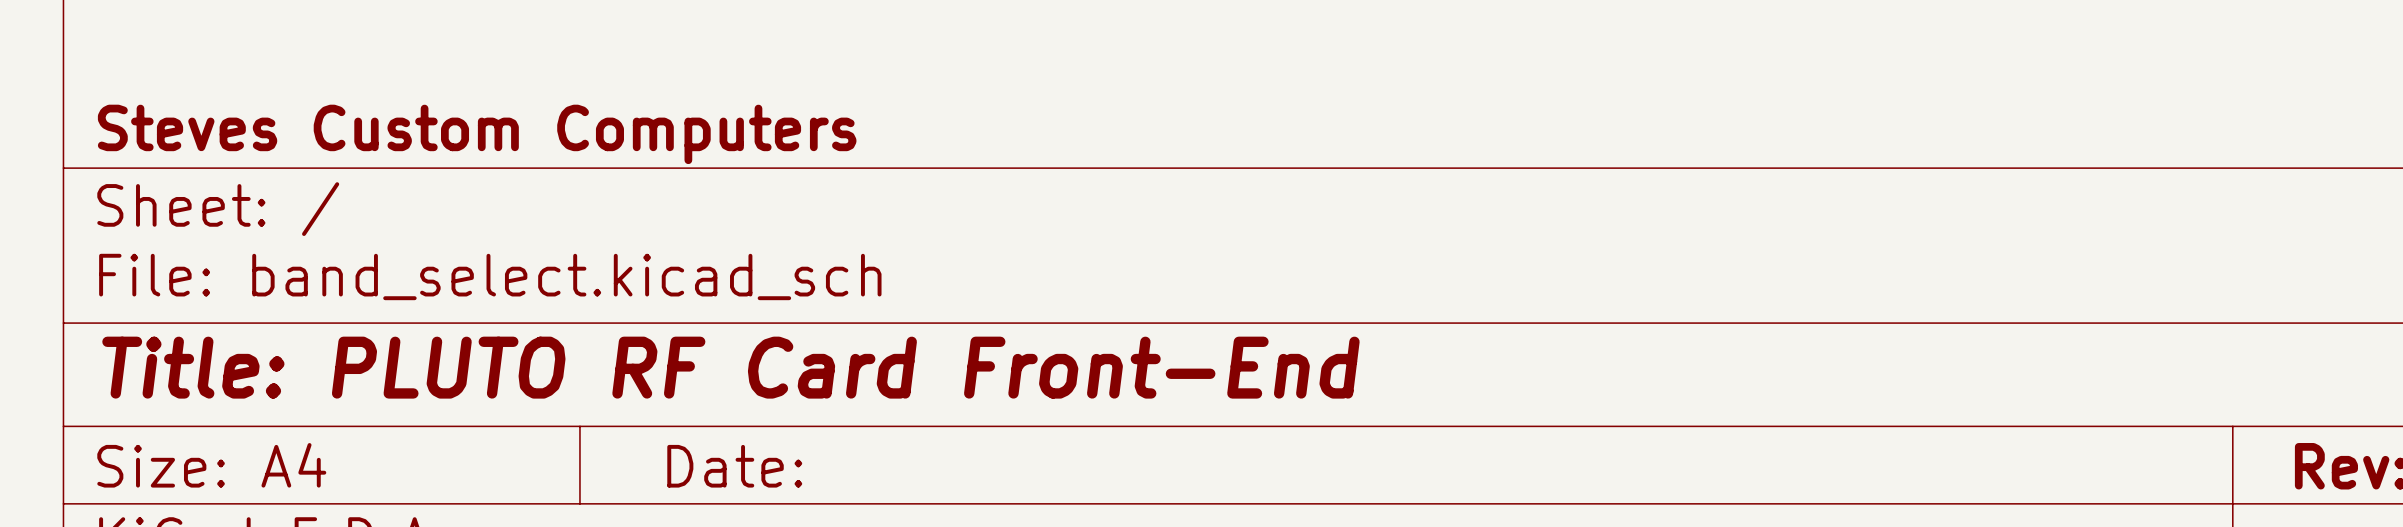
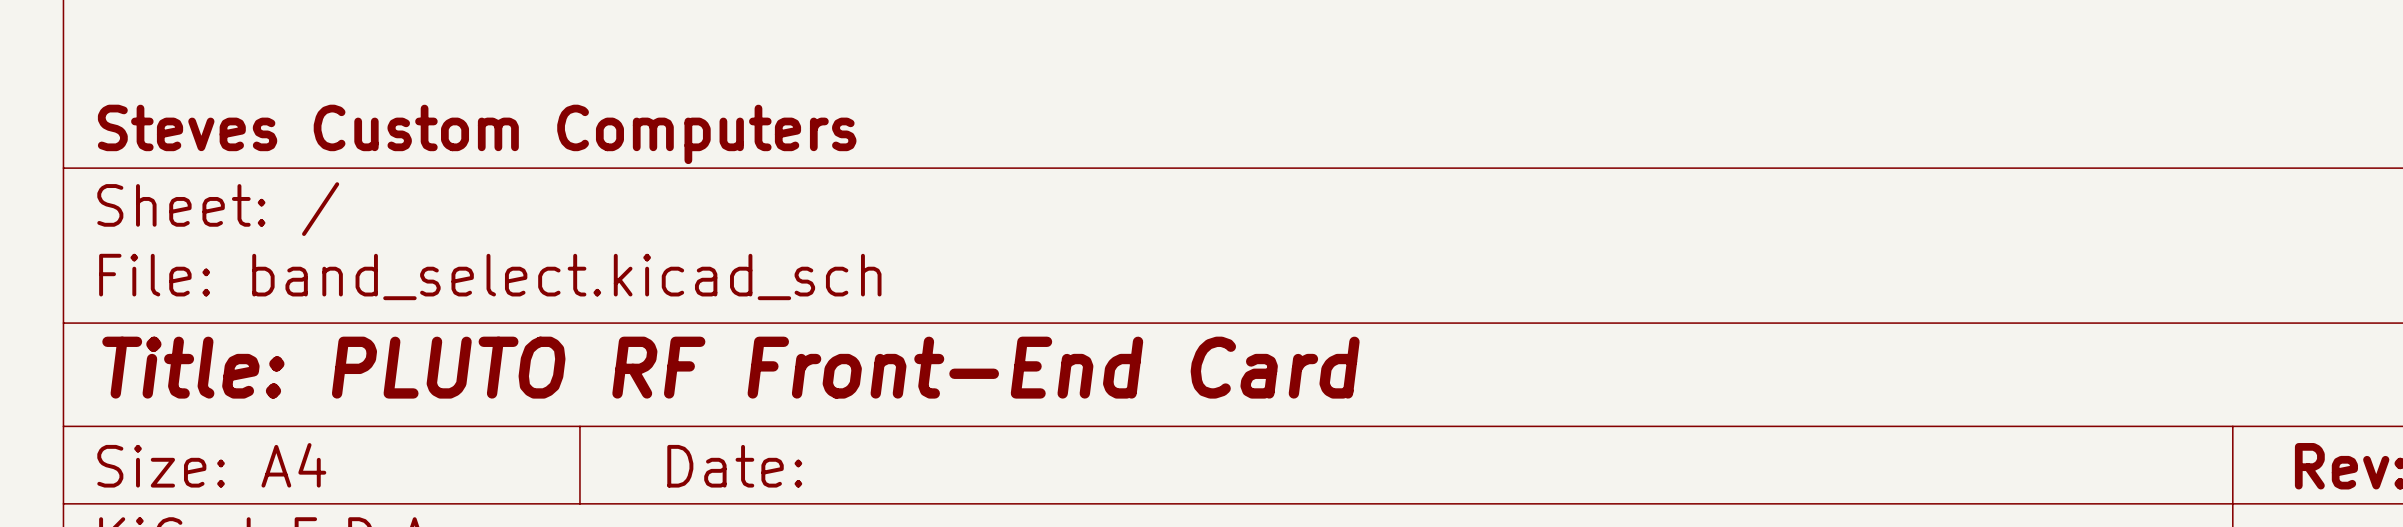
title block: Title: PLUTO RF Card Front-End (730, 367) -> Title: PLUTO RF Front-End Card (730, 367)

